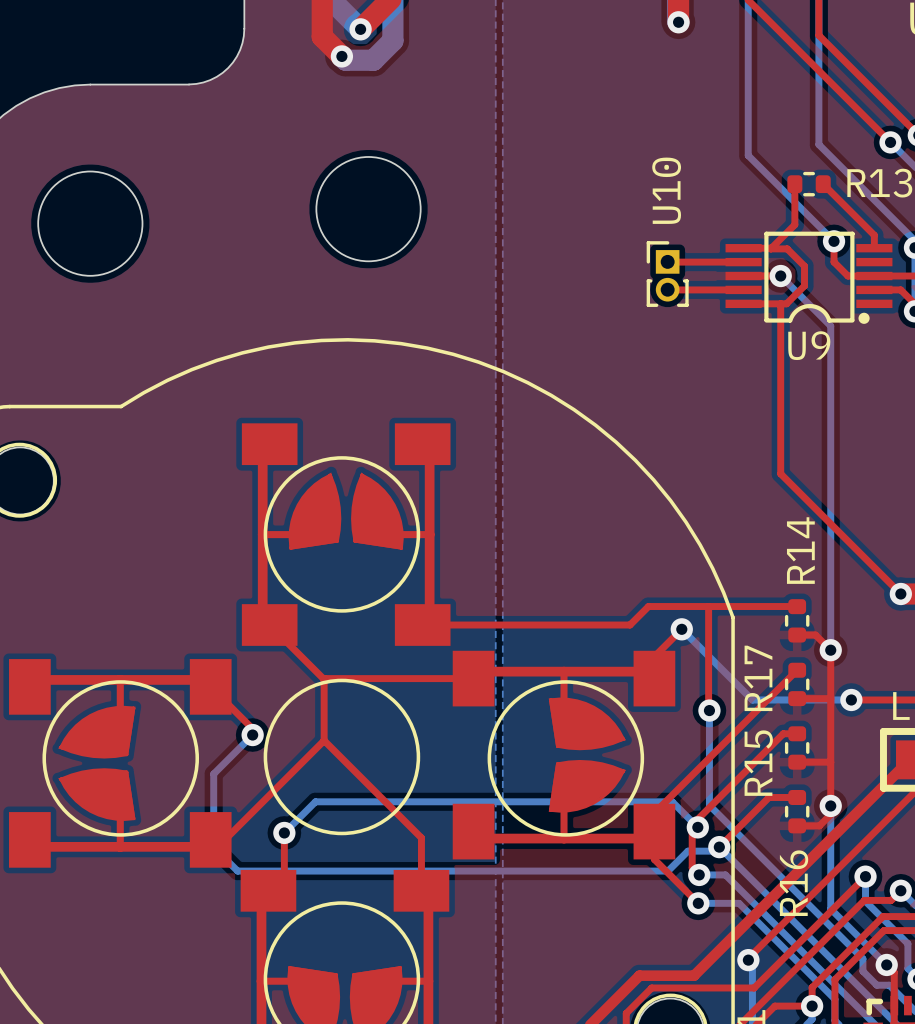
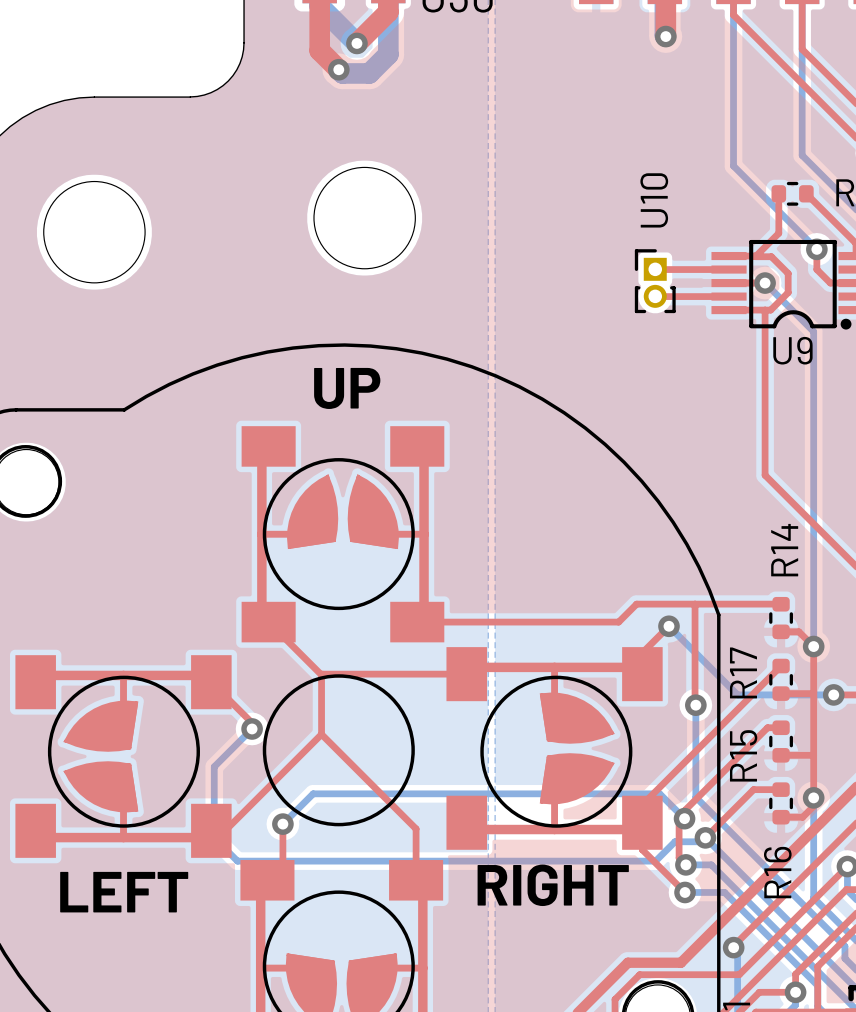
text: none -> UP (347, 388)
text: none -> RIGHT (553, 885)
text: none -> LEFT (124, 892)

